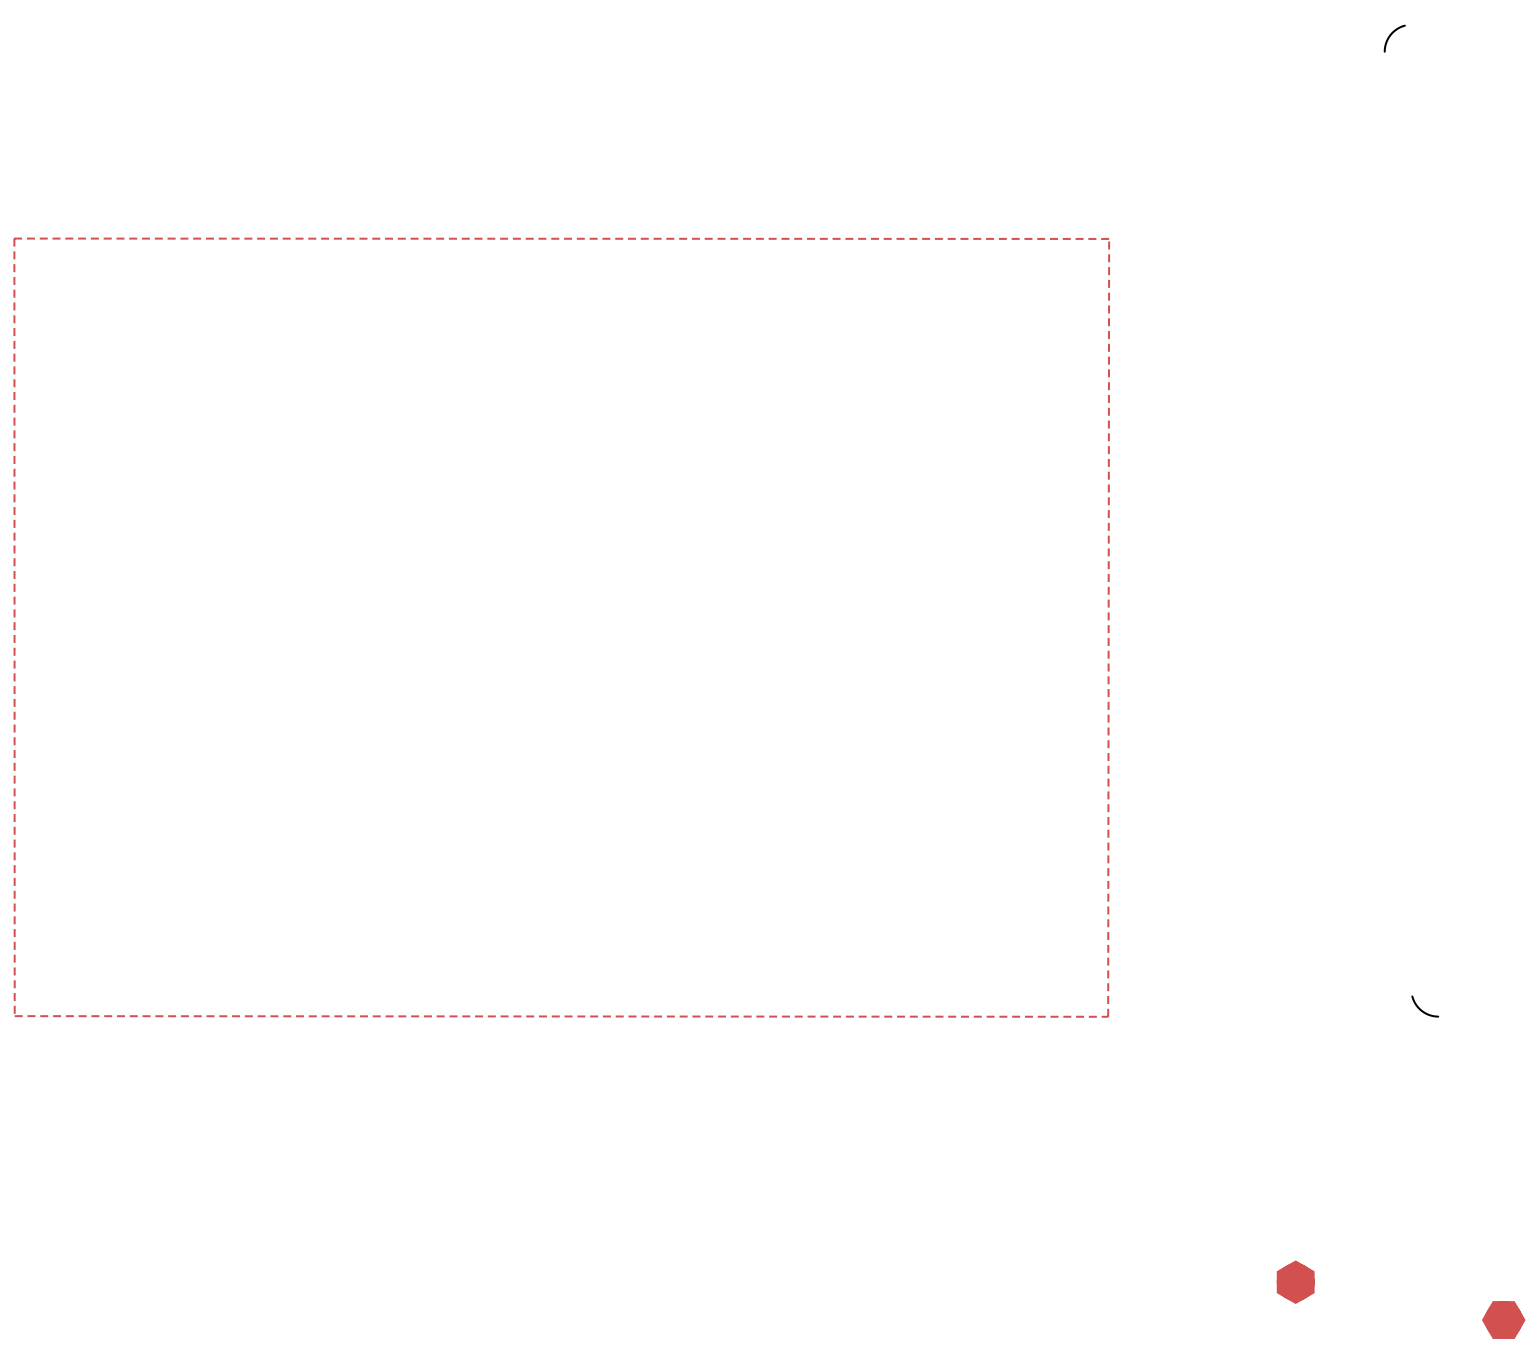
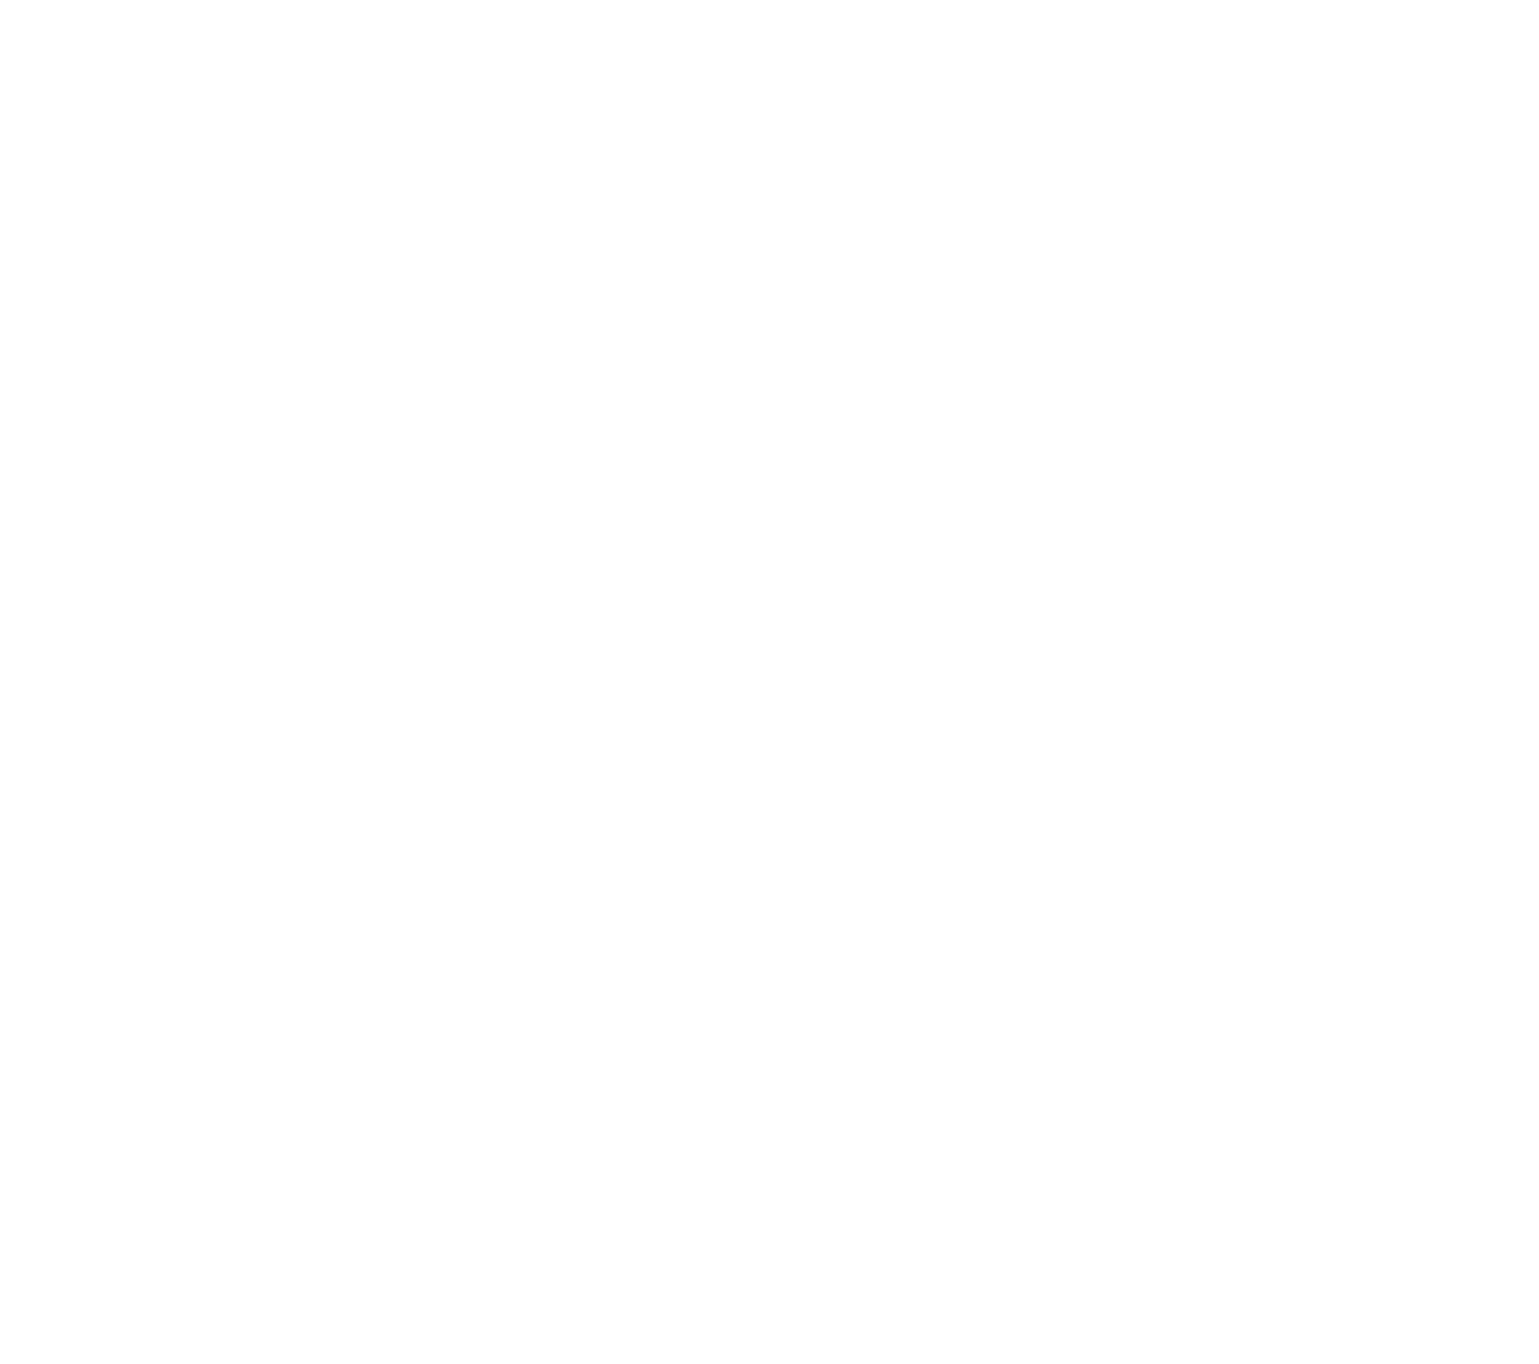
board edge: (1404, 25) (1390, 35) (1384, 51) -> none
top zone outline: (14, 238) (1109, 238) (1108, 1016) (14, 1016) (14, 238) -> none
board edge: (1412, 996) (1421, 1010) (1438, 1016) -> none
part: (1295, 1282) -> none
part: (1503, 1320) -> none

